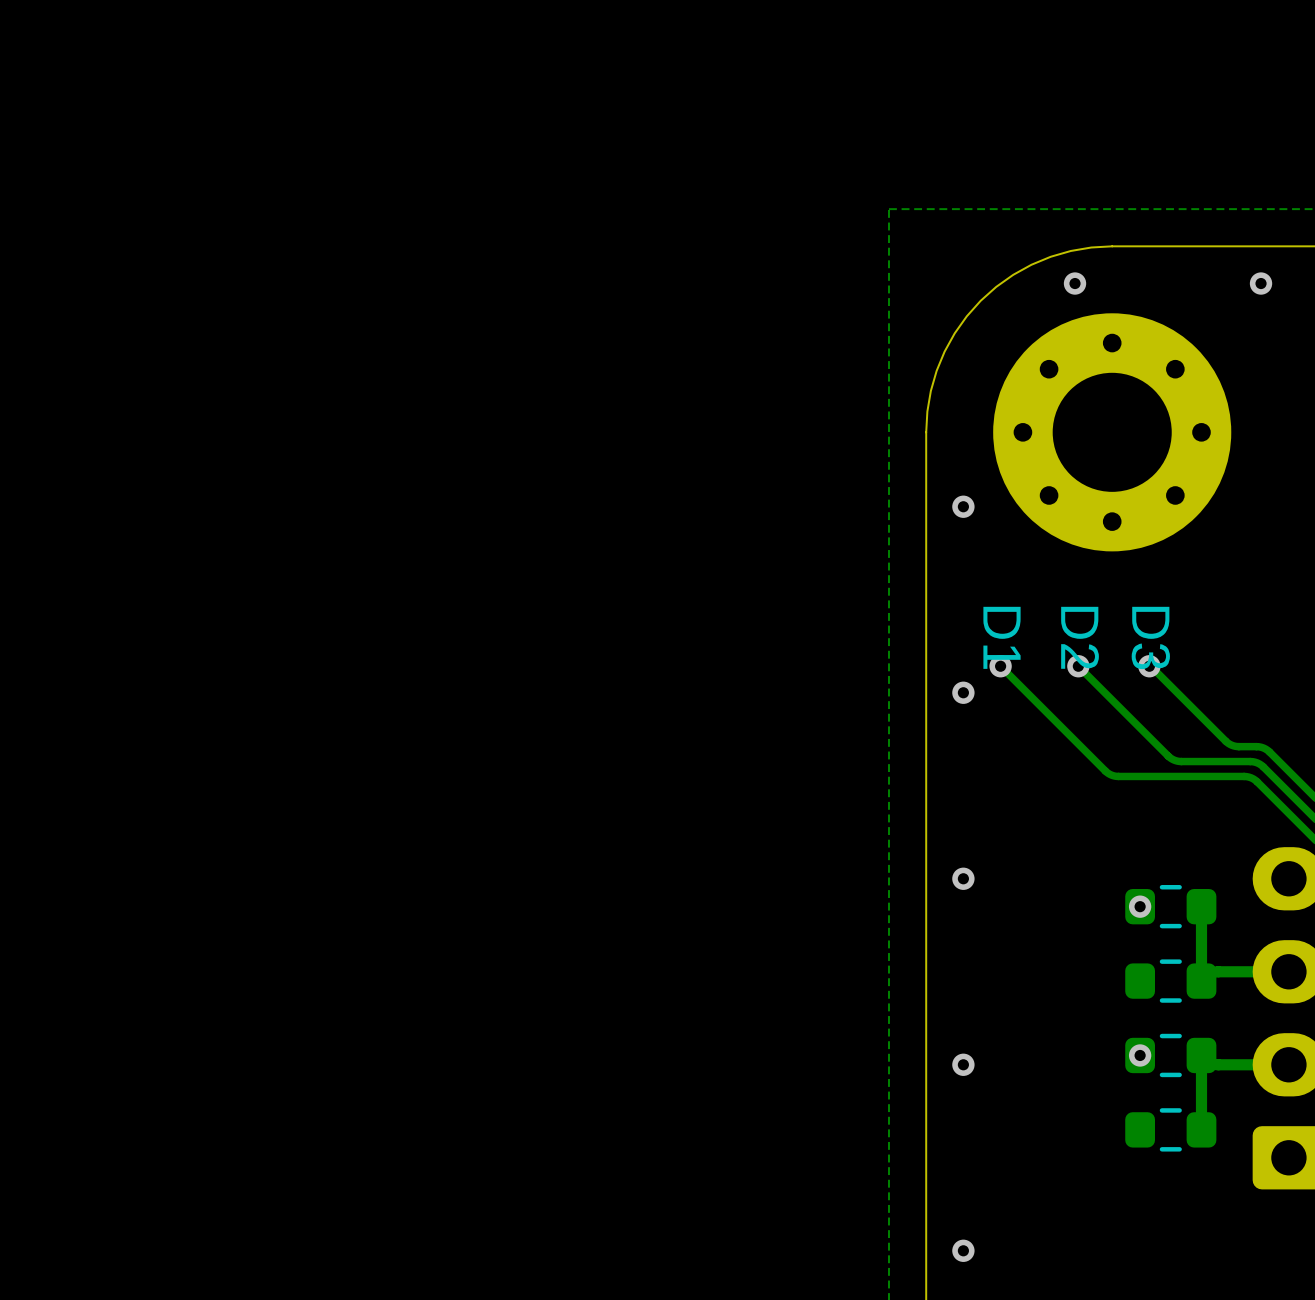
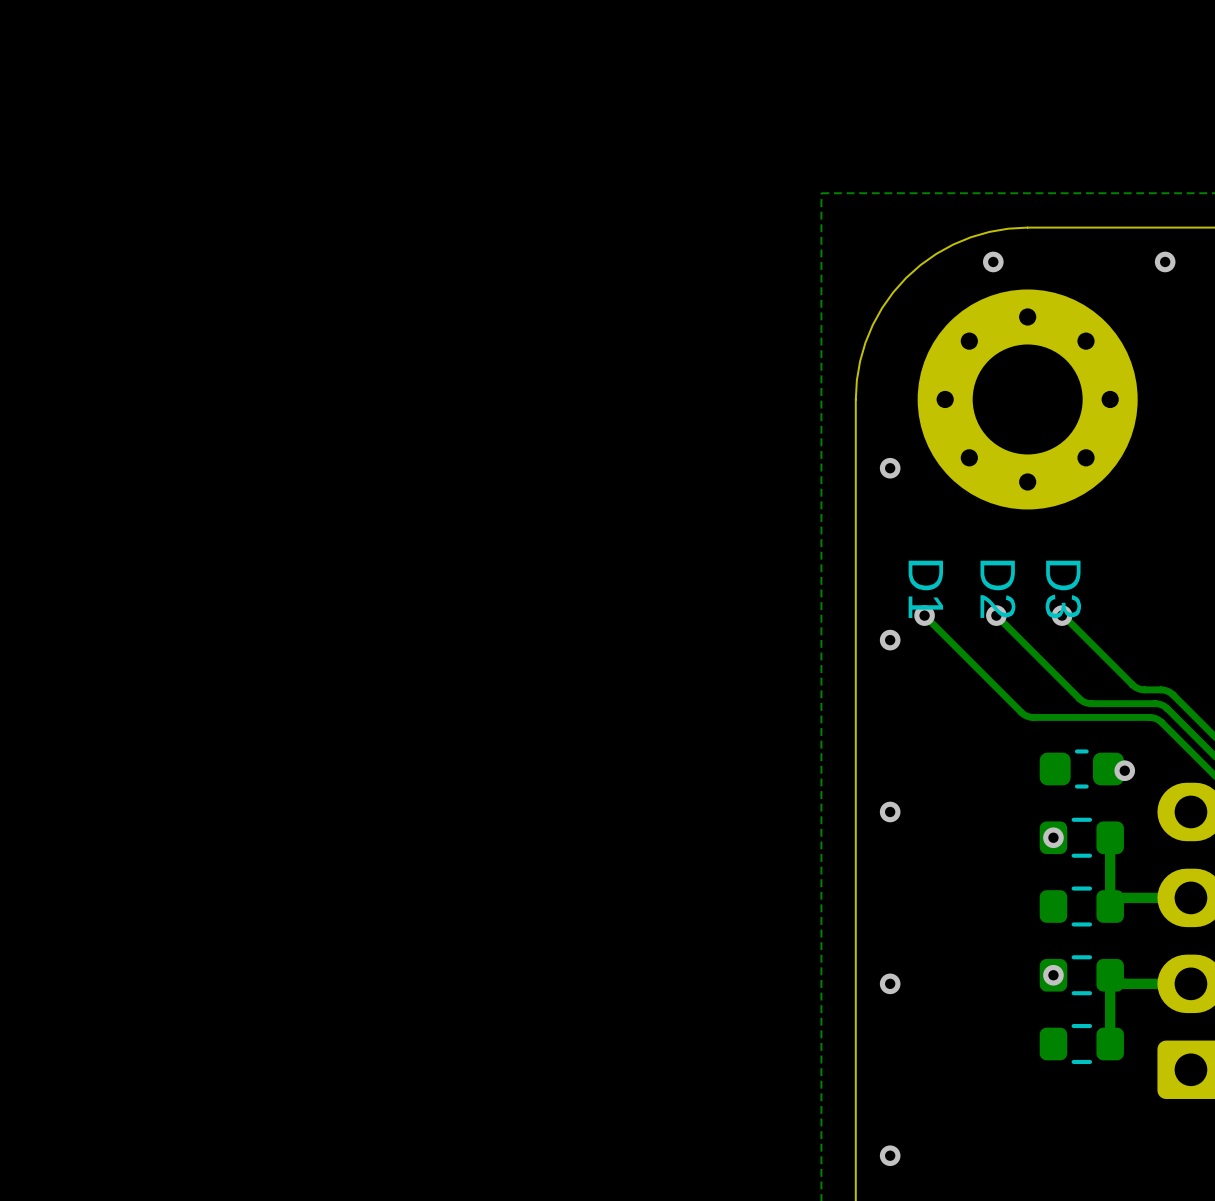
part: none -> (1081, 769)
via: none -> (1124, 770)

